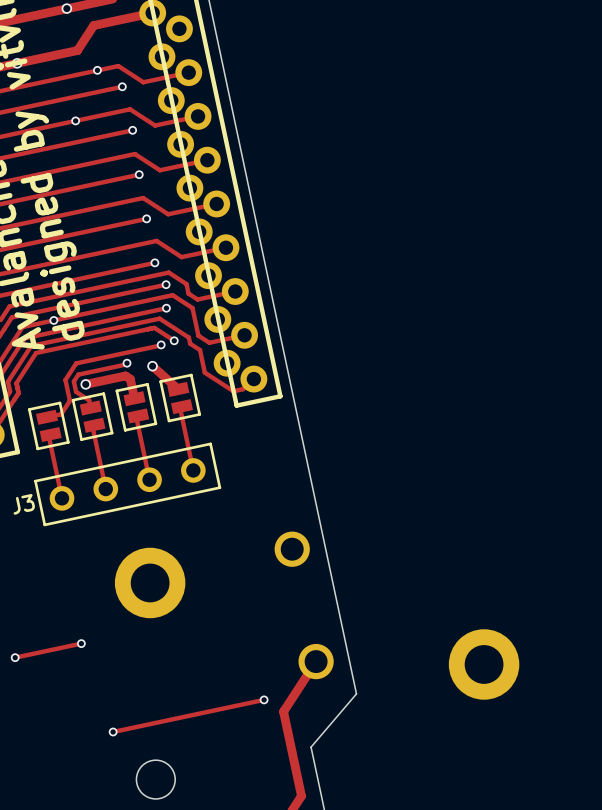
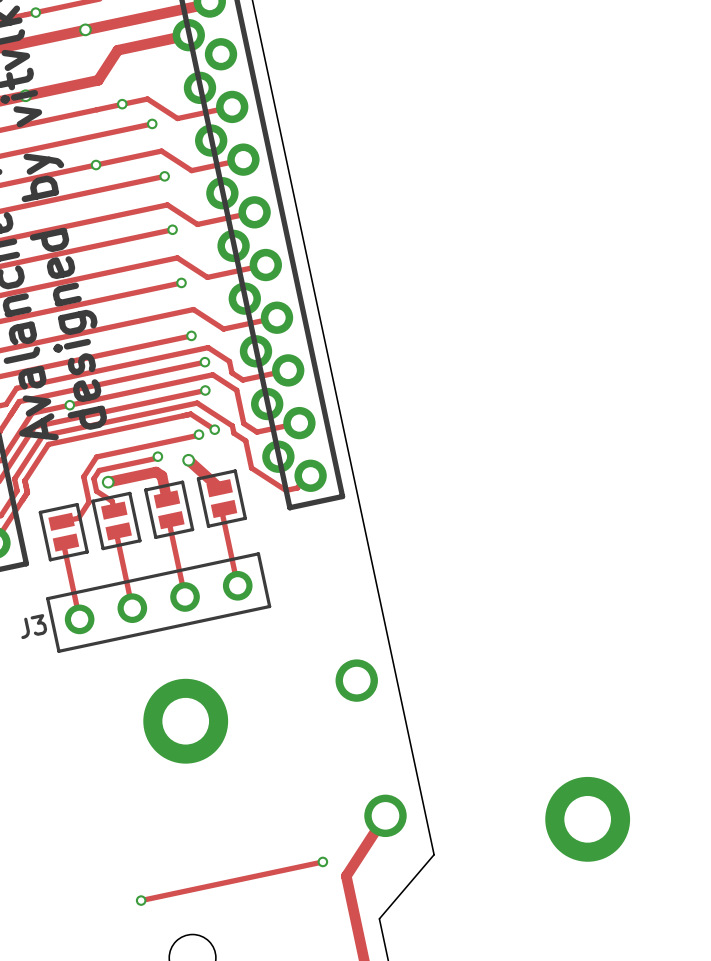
track: (81, 643) (15, 657) -> none
via: (81, 643) -> none
via: (15, 657) -> none

